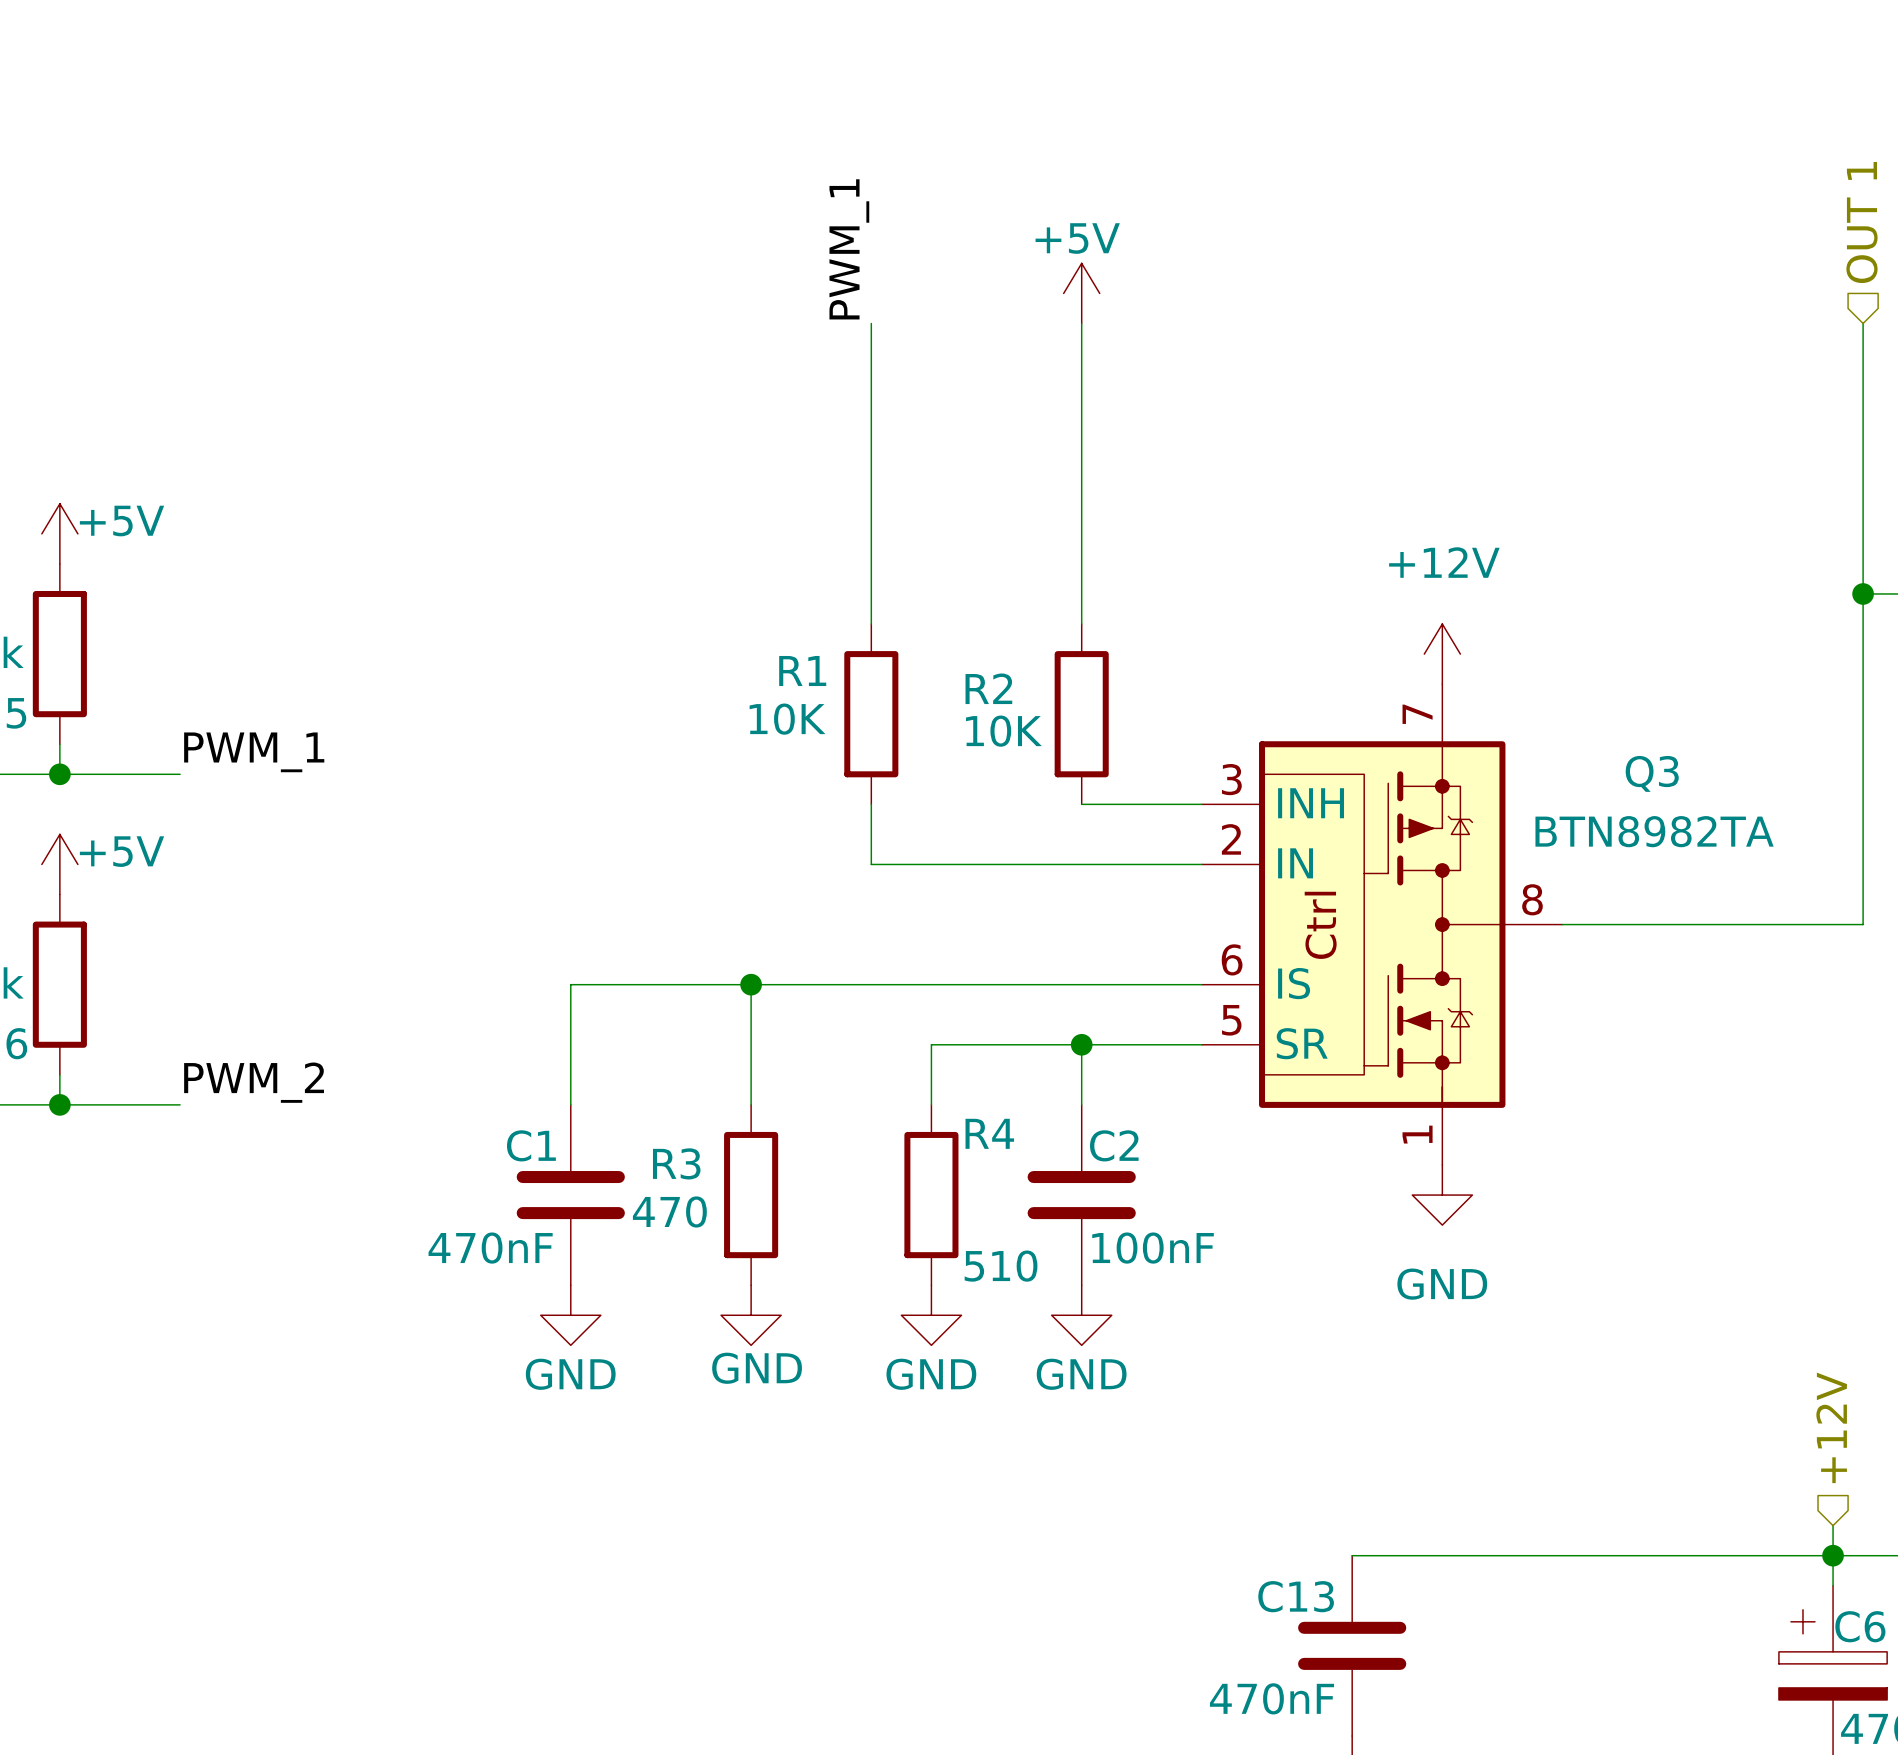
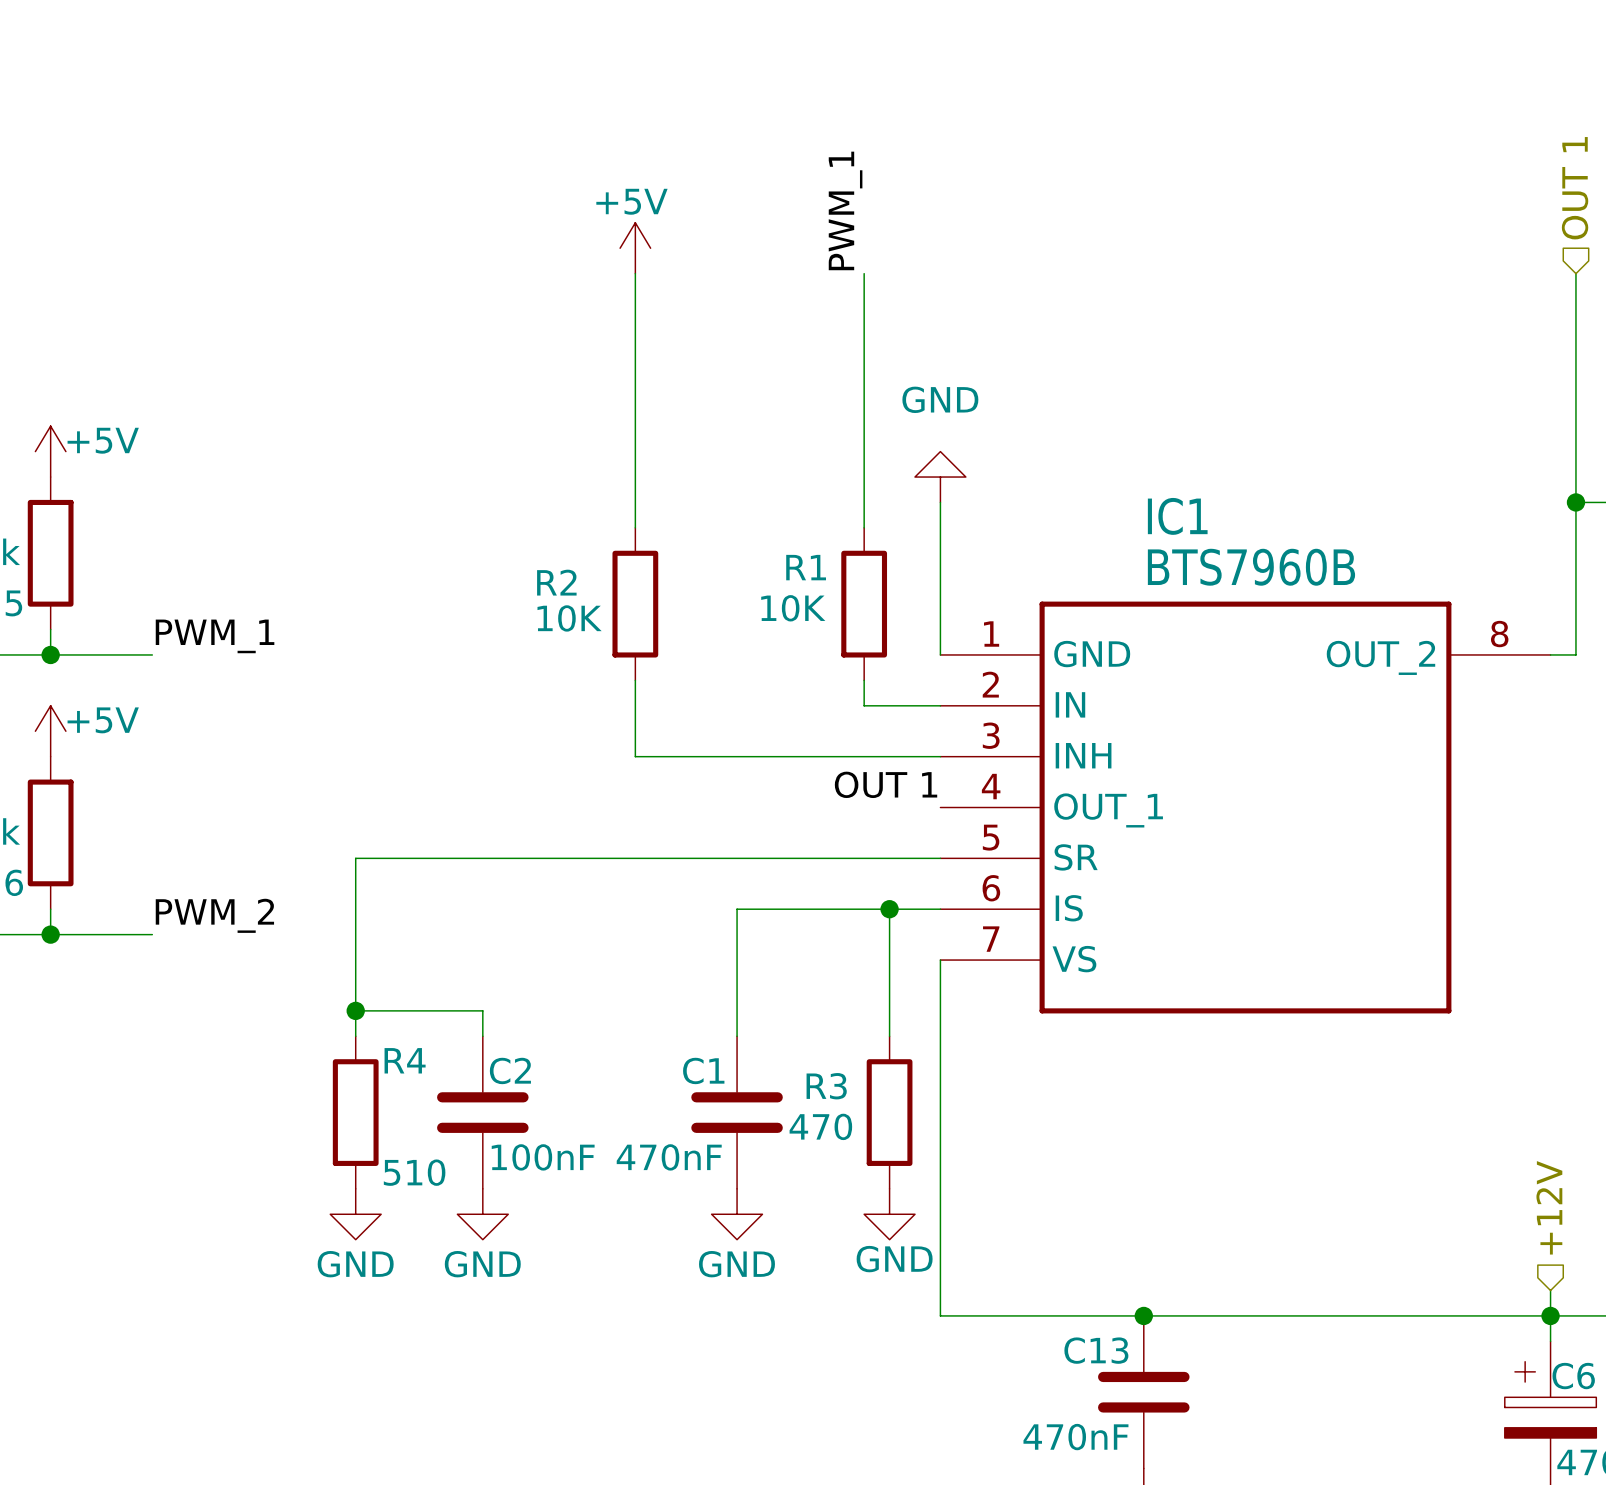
label position: PWM_1 (849, 249) -> PWM_1 (845, 210)
power symbol position: +5V (1081, 293) -> +5V (635, 248)
wire: (871, 323) (871, 624) -> (635, 273) (635, 527)
wire: (1081, 323) (1081, 624) -> (864, 273) (864, 527)
power symbol: none -> GND (940, 477)
wire: none -> (940, 502) (940, 654)
power symbol: +12V (1442, 654) -> none
R1 position: (871, 714) -> (864, 604)
R2 position: (1081, 714) -> (635, 604)
wire: (1863, 774) (1863, 924) (1562, 924) -> (1575, 654) (1550, 654)
wire: none -> (635, 680) (635, 756) (940, 756)
wire: (871, 804) (871, 864) (1201, 864) -> none
wire: none -> (864, 680) (864, 705) (940, 705)
wire: (1081, 804) (1201, 804) -> none
Q3: BTN8982TA (1382, 924) -> none
label: none -> OUT 1 (886, 784)
IC1: none -> BTS7960B (1245, 807)
wire: (751, 984) (751, 1104) -> none
junction: (751, 984) -> none
wire: (1201, 984) (570, 984) (570, 1104) -> none
wire: none -> (940, 858) (355, 858) (355, 1036)
wire: (1081, 1044) (1081, 1104) -> none
junction position: (1081, 1044) -> (889, 909)
wire: (1201, 1044) (931, 1044) (931, 1104) -> none
wire: none -> (889, 909) (889, 1036)
wire: none -> (940, 909) (737, 909) (737, 1036)
wire: none -> (940, 960) (940, 1315) (1143, 1315)
wire: none -> (355, 1010) (482, 1010) (482, 1036)
junction: none -> (355, 1010)
C1 position: (570, 1195) -> (737, 1112)
R3 position: (751, 1195) -> (889, 1112)
R4 position: (931, 1195) -> (355, 1112)
C2 position: (1081, 1195) -> (482, 1112)
power symbol: GND (1442, 1195) -> none
power symbol: GND (570, 1315) -> none
power symbol: GND (751, 1315) -> none
power symbol: GND (931, 1315) -> none
power symbol: GND (1081, 1315) -> none
power symbol: none -> GND (355, 1214)
power symbol: none -> GND (482, 1214)
power symbol: none -> GND (737, 1214)
power symbol: none -> GND (889, 1214)
junction: none -> (1143, 1315)

